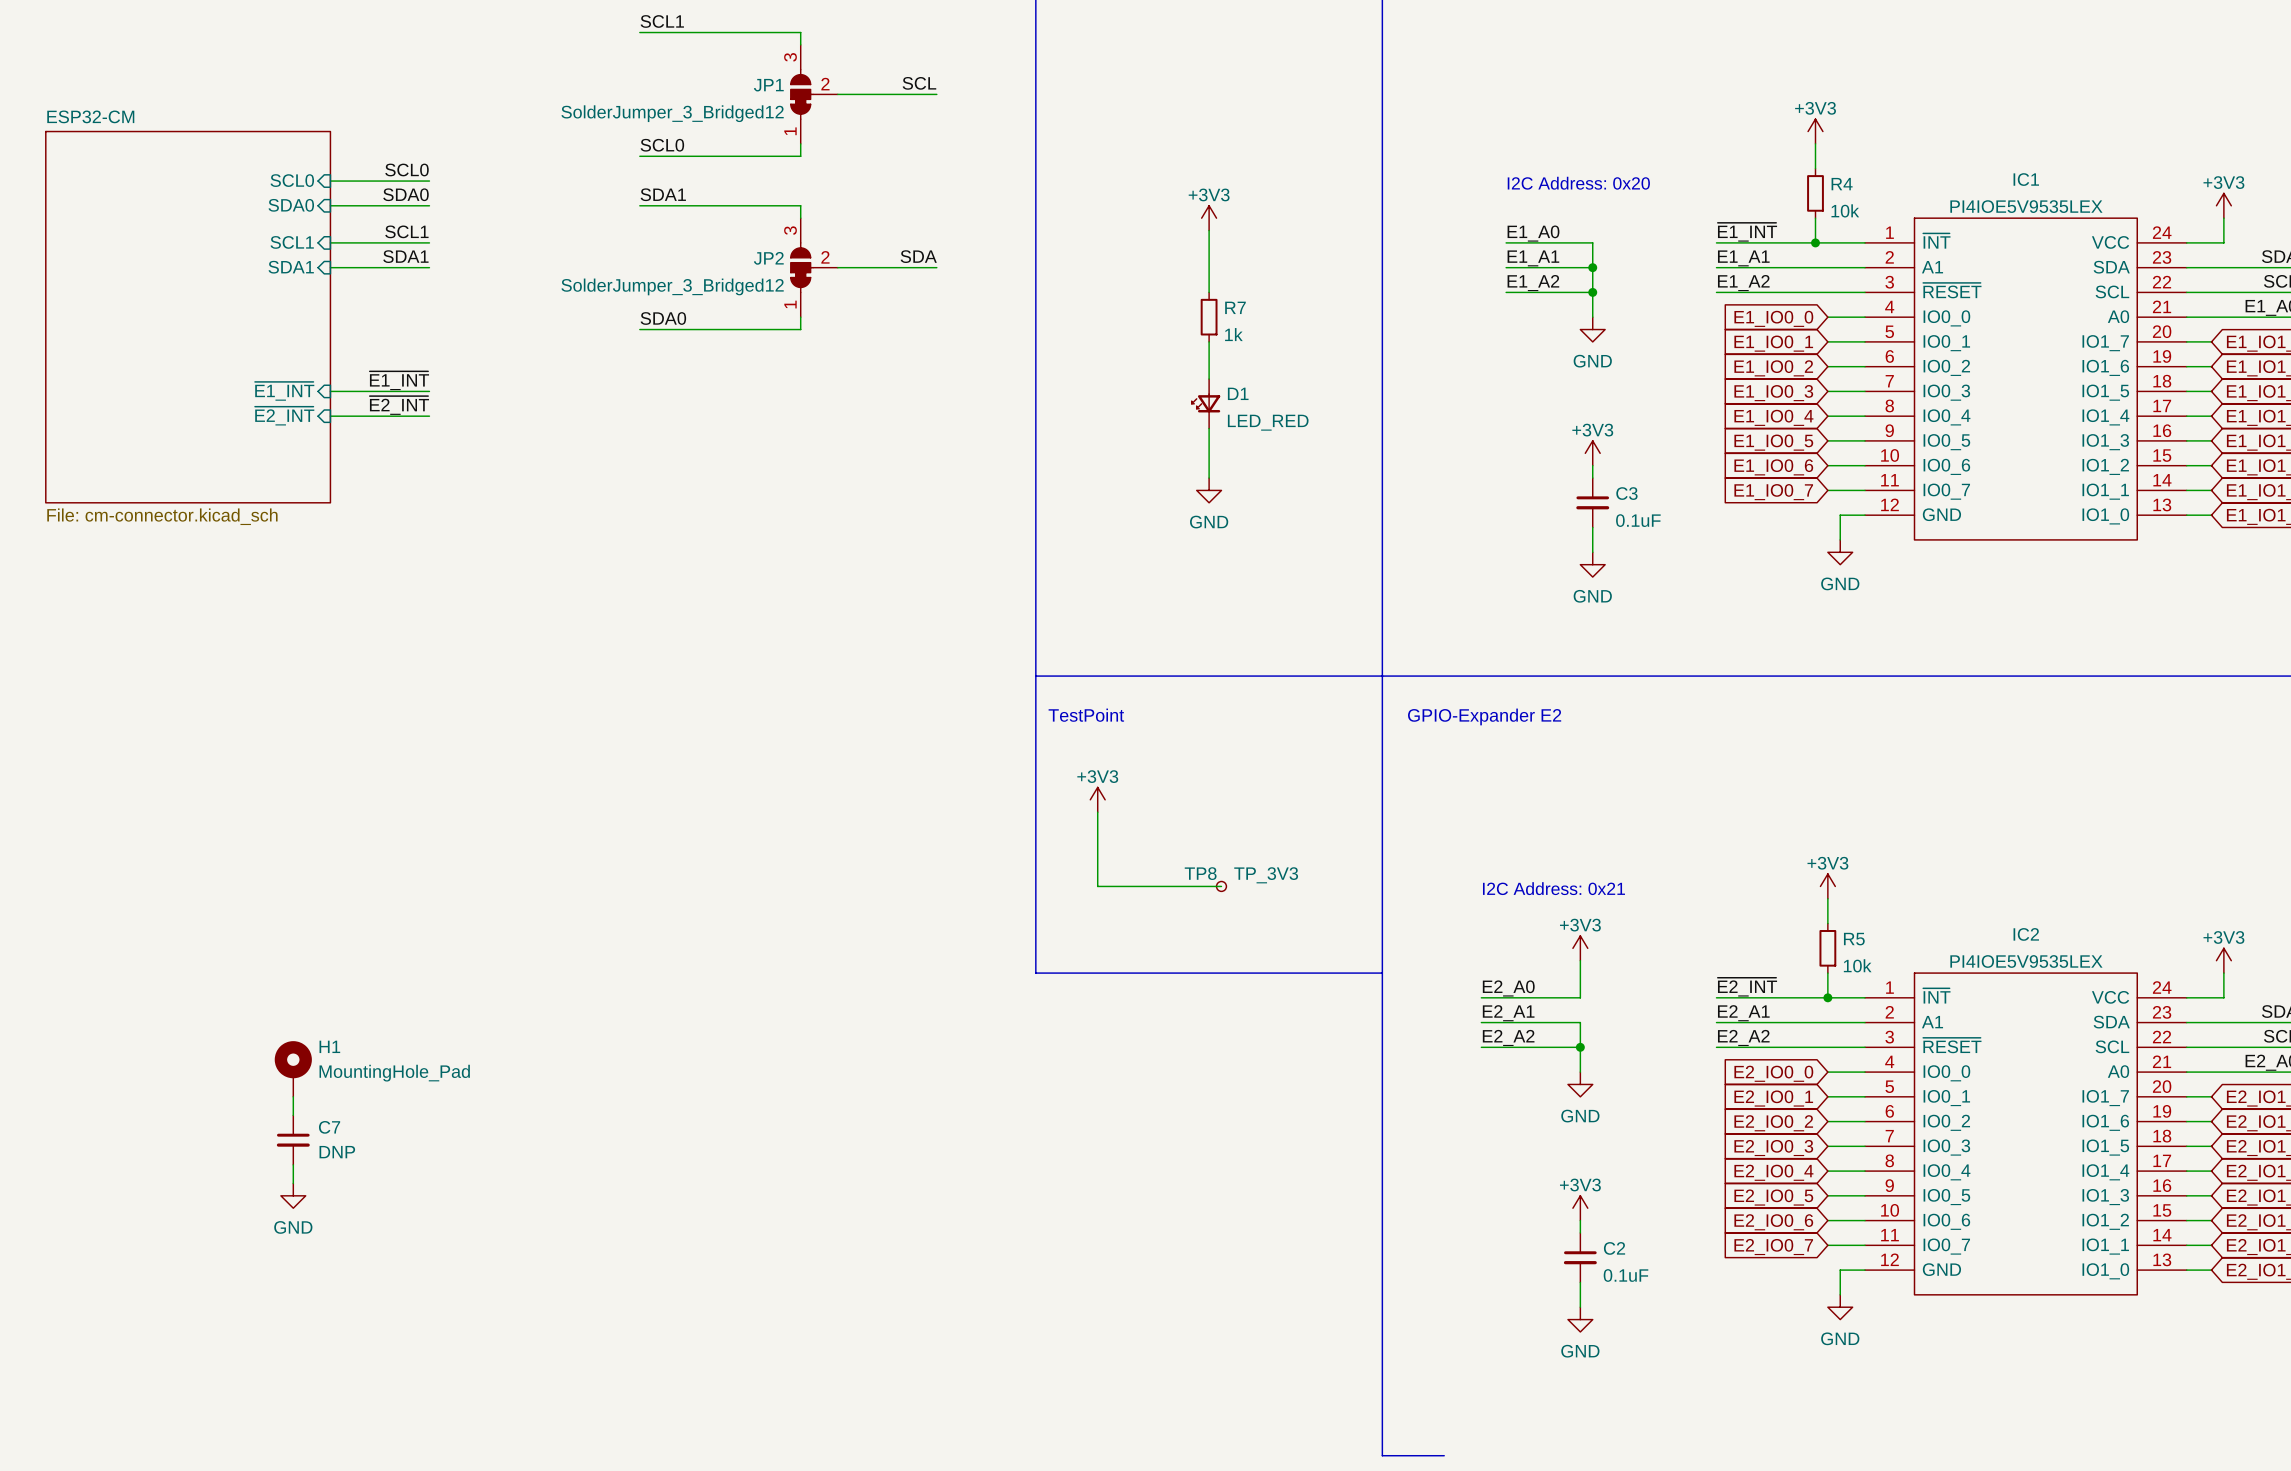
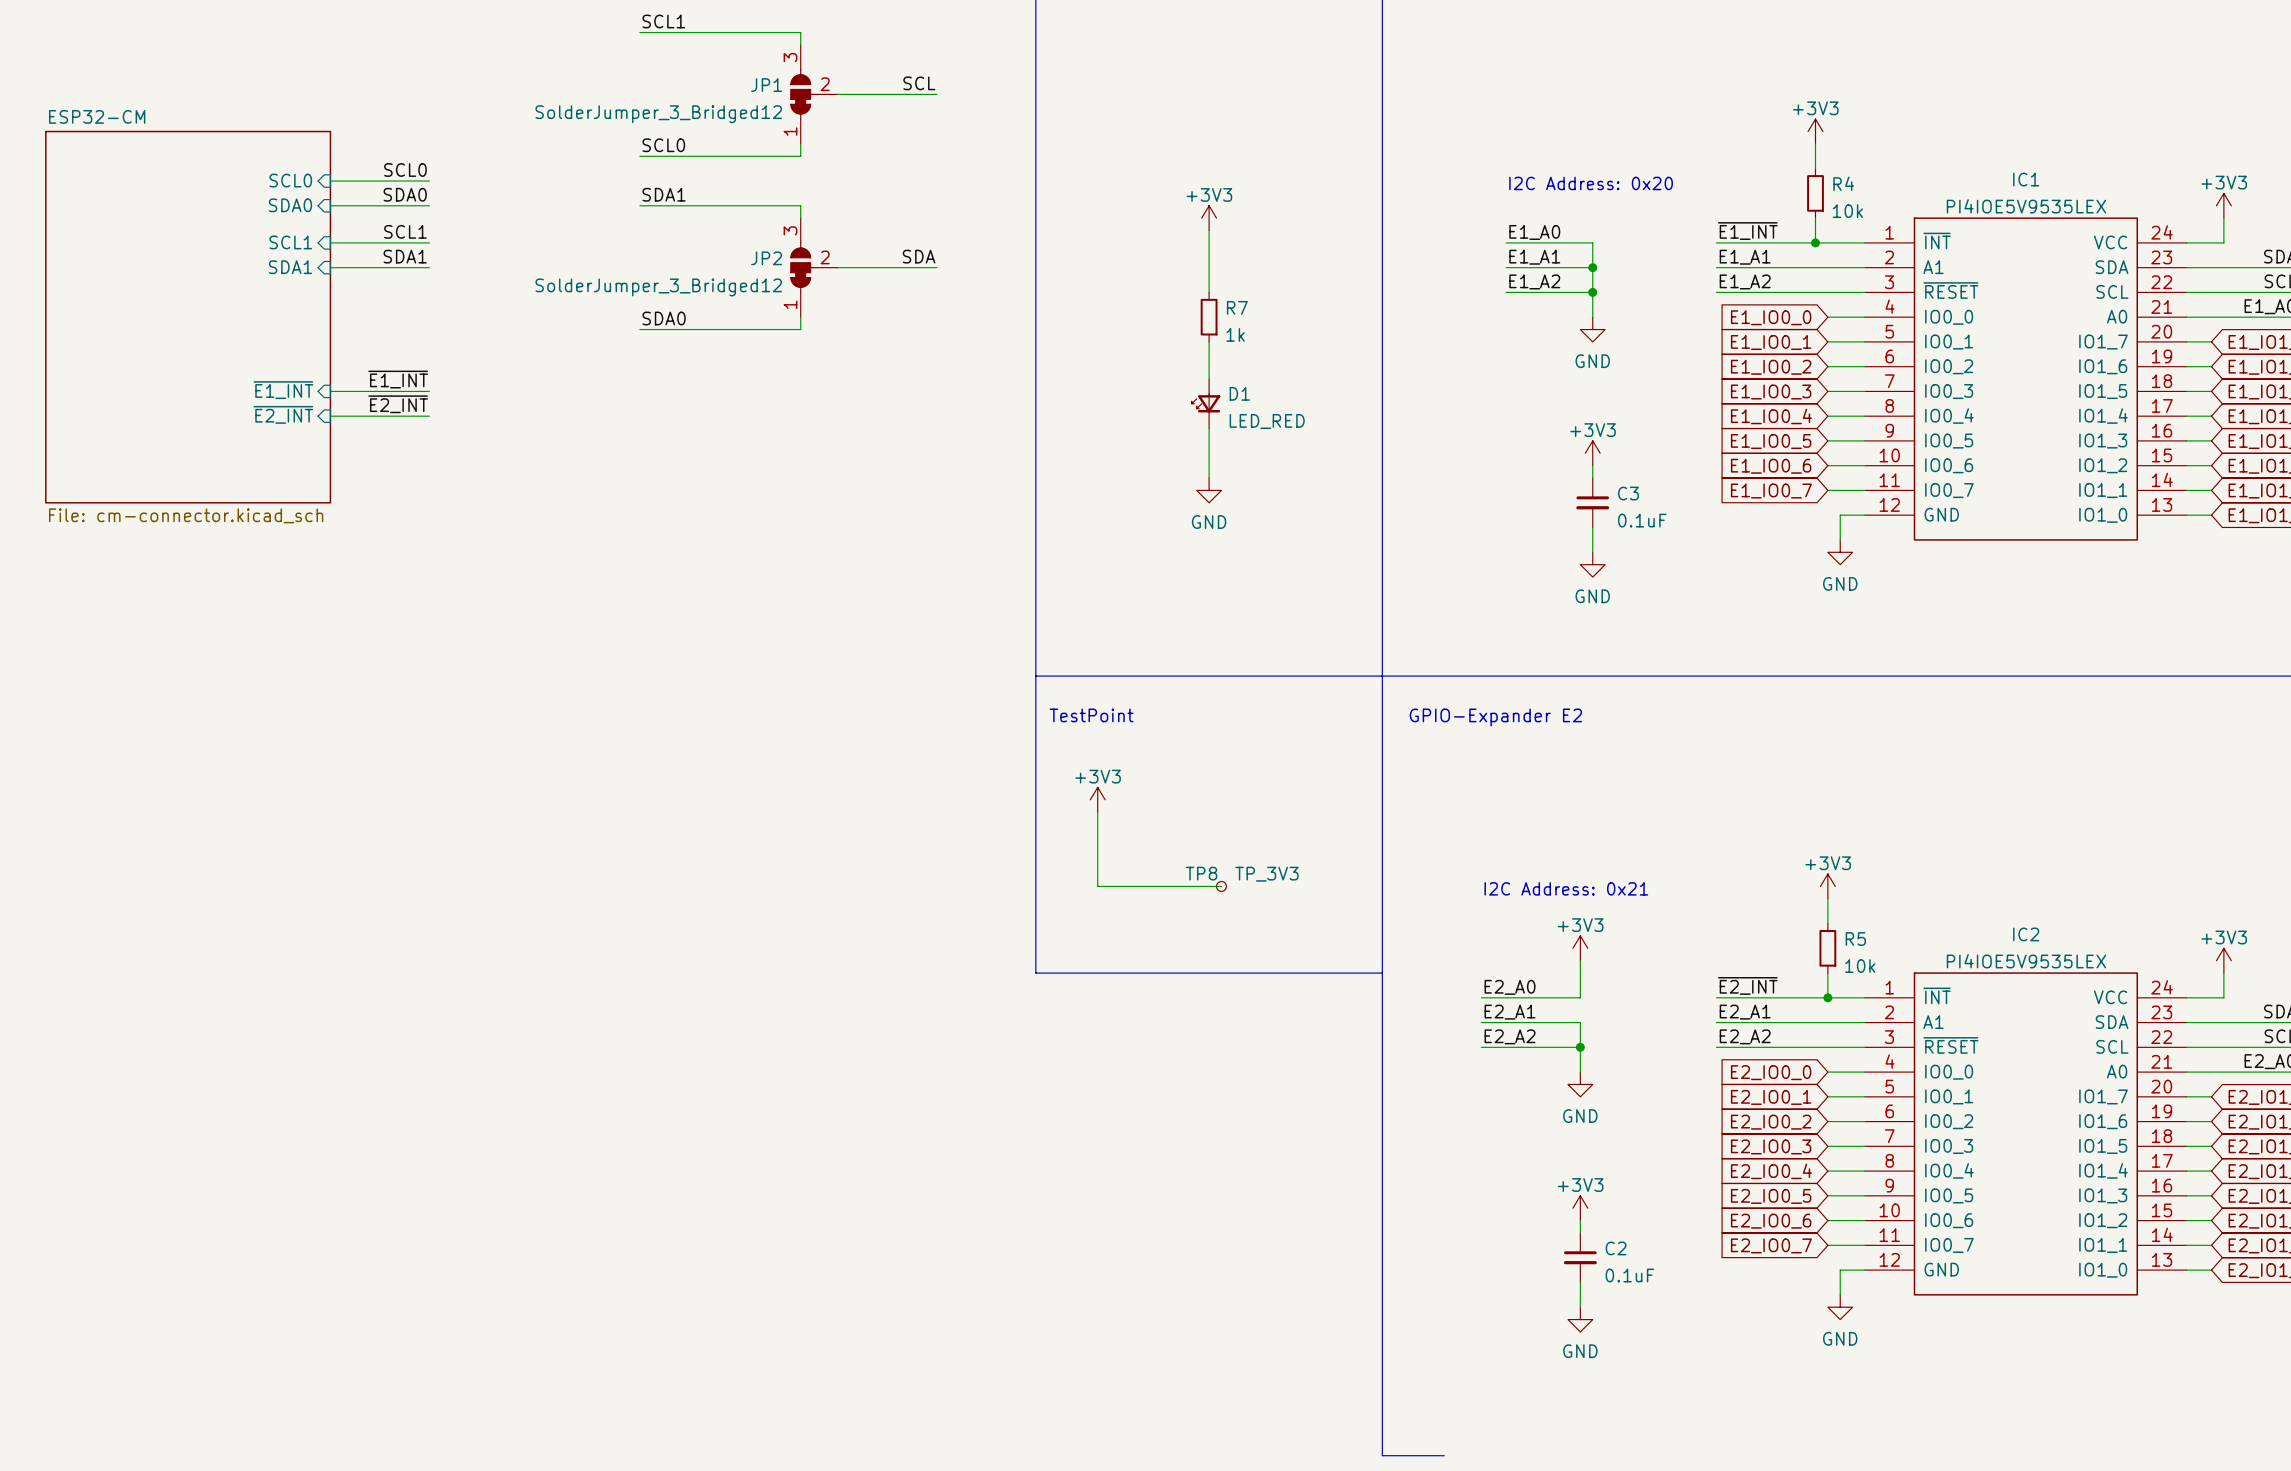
H1: MountingHole_Pad (293, 1068) -> none
wire: (293, 1096) (293, 1115) -> none
C7: DNP (293, 1140) -> none
wire: (293, 1164) (293, 1183) -> none
power symbol: GND (293, 1195) -> none

